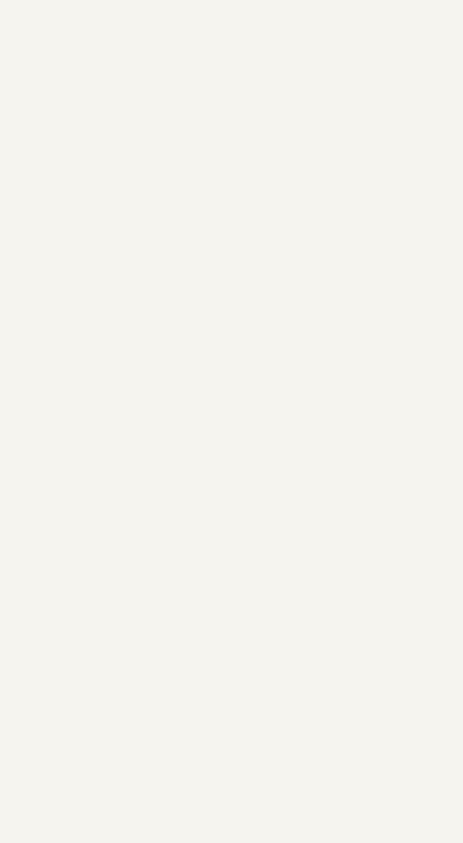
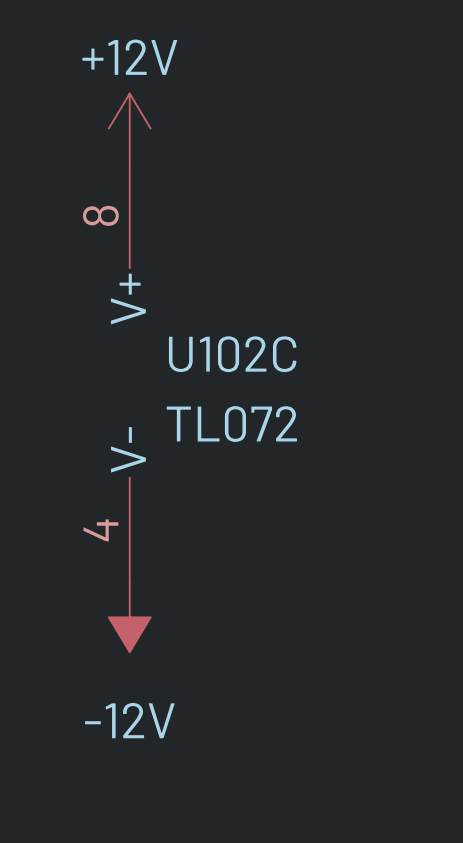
power symbol: none -> +12V (129, 128)
U102C: none -> TL072 (129, 372)
power symbol: none -> -12V (129, 617)

